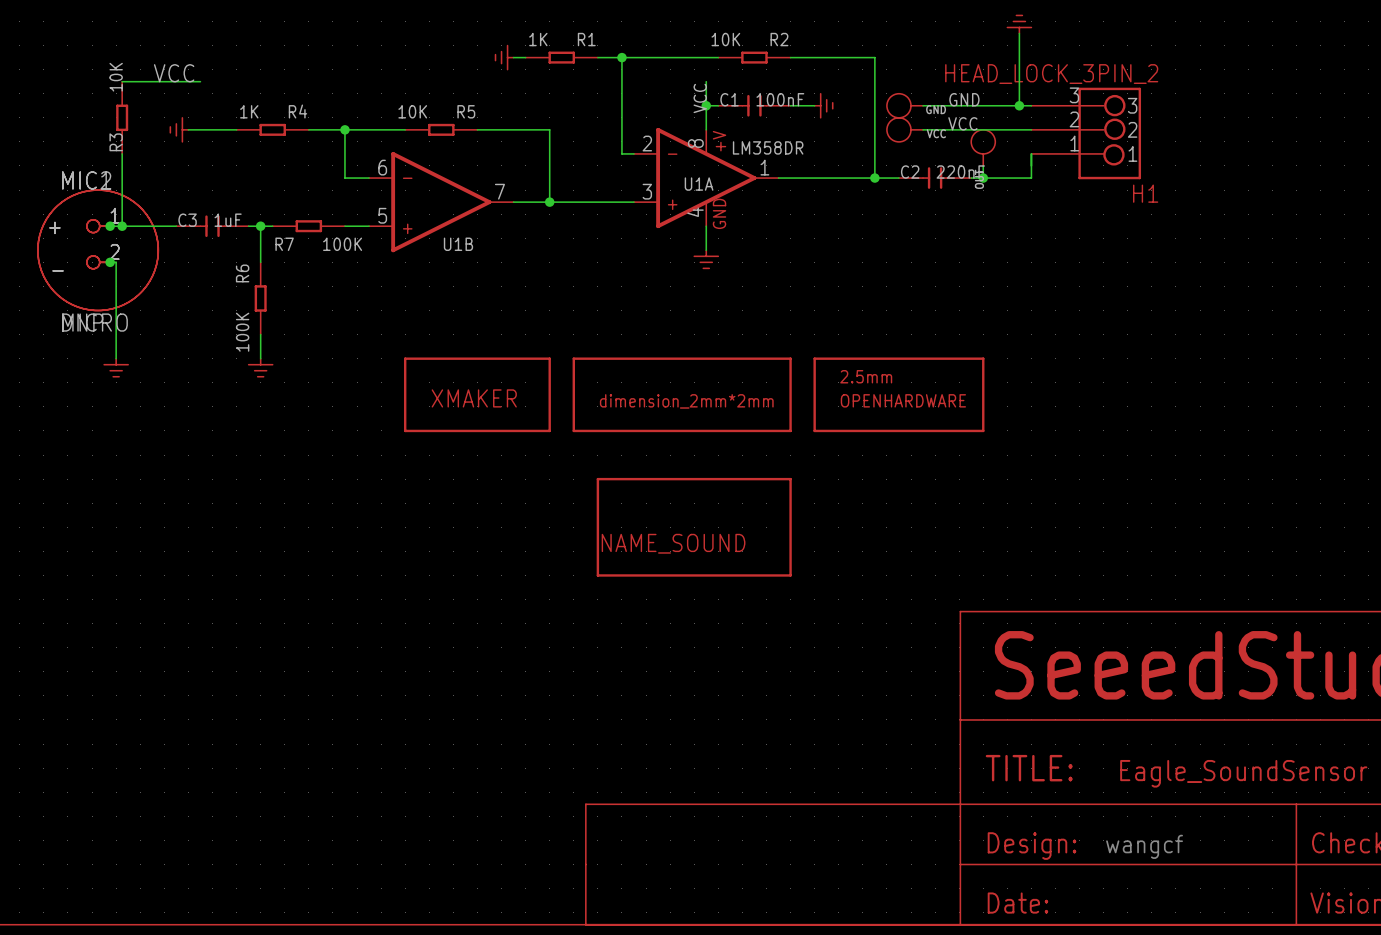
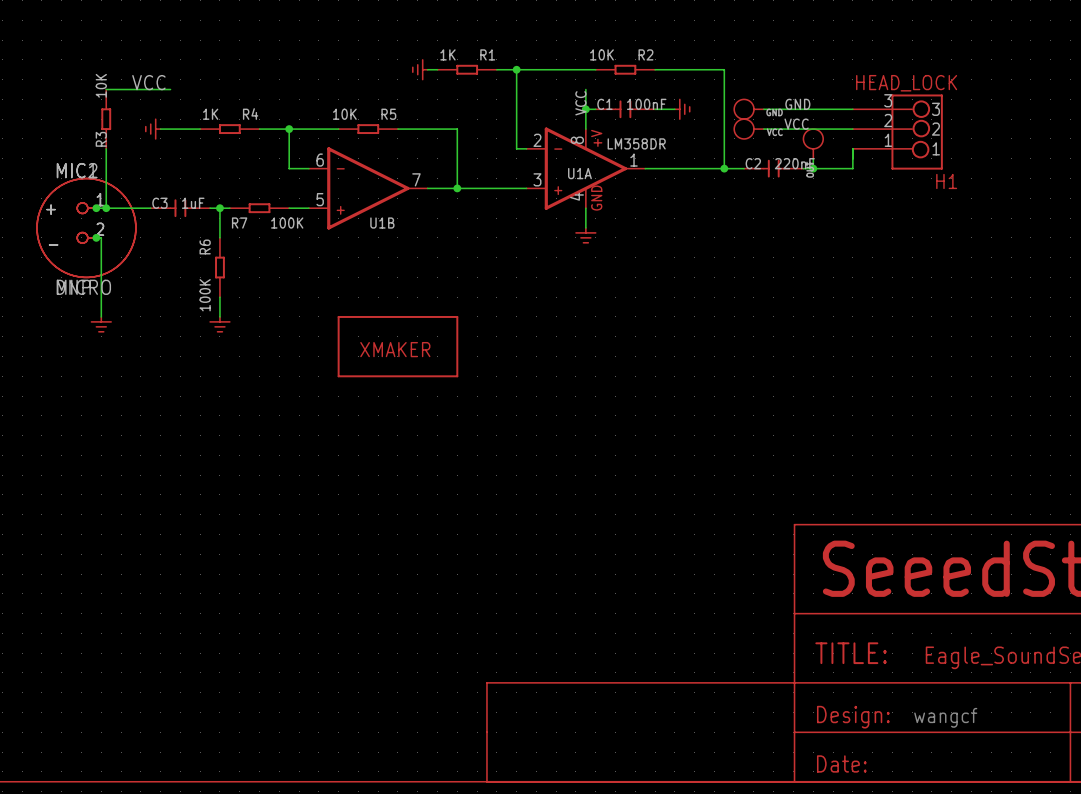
power symbol: (1019, 24) -> none
wire: (1019, 33) (1019, 105) -> none
H1 value: HEAD_LOCK_3PIN_2 (1051, 74) -> HEAD_LOCK (906, 83)
junction: (1019, 105) -> none
part: (682, 394) -> none
part: (898, 394) -> none
part: (694, 527) -> none

